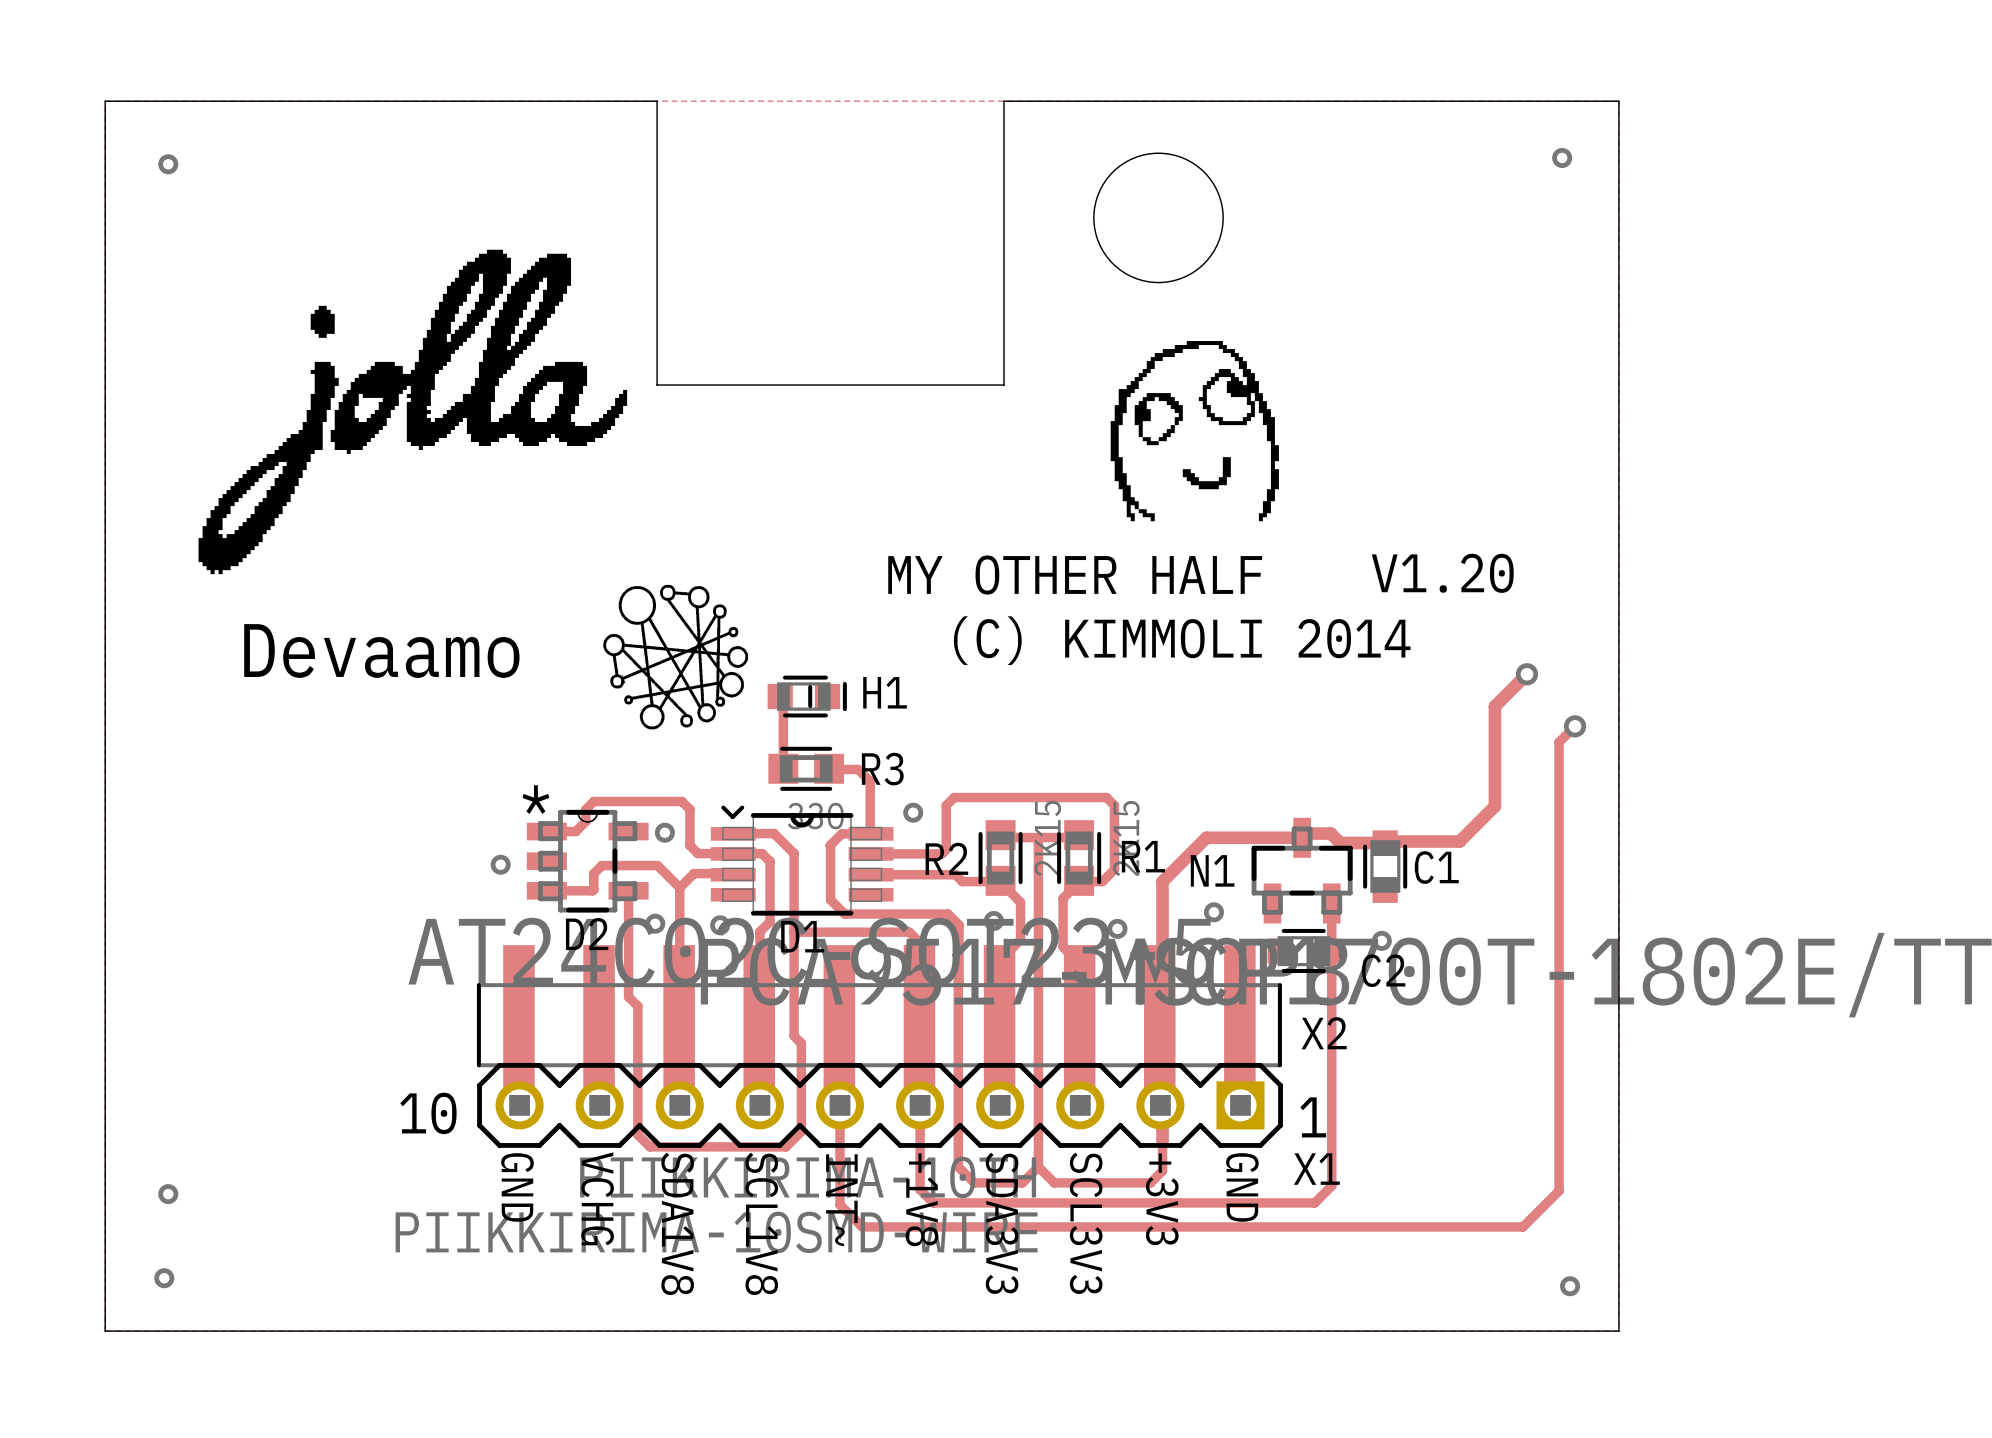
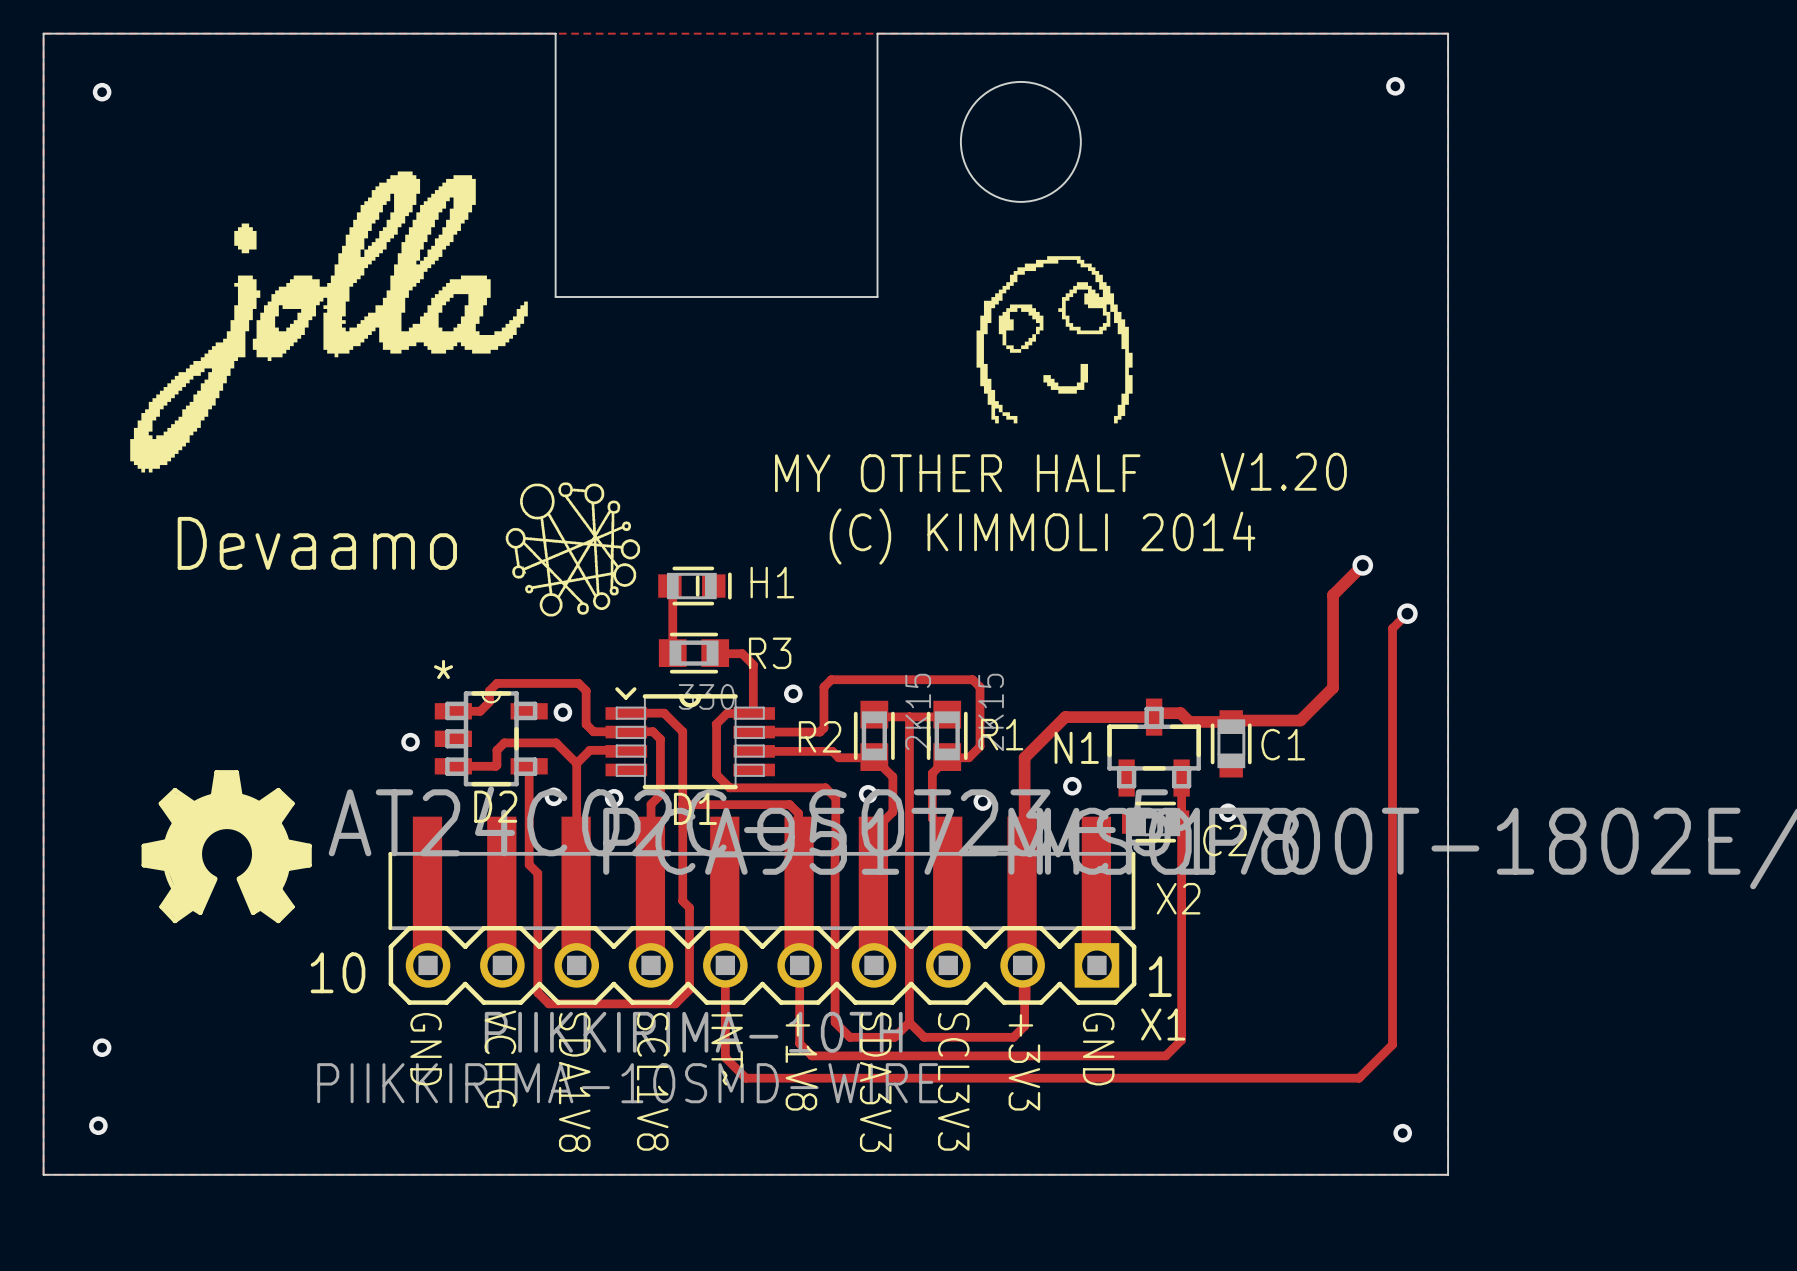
drawing: none -> [141, 770, 312, 924]

